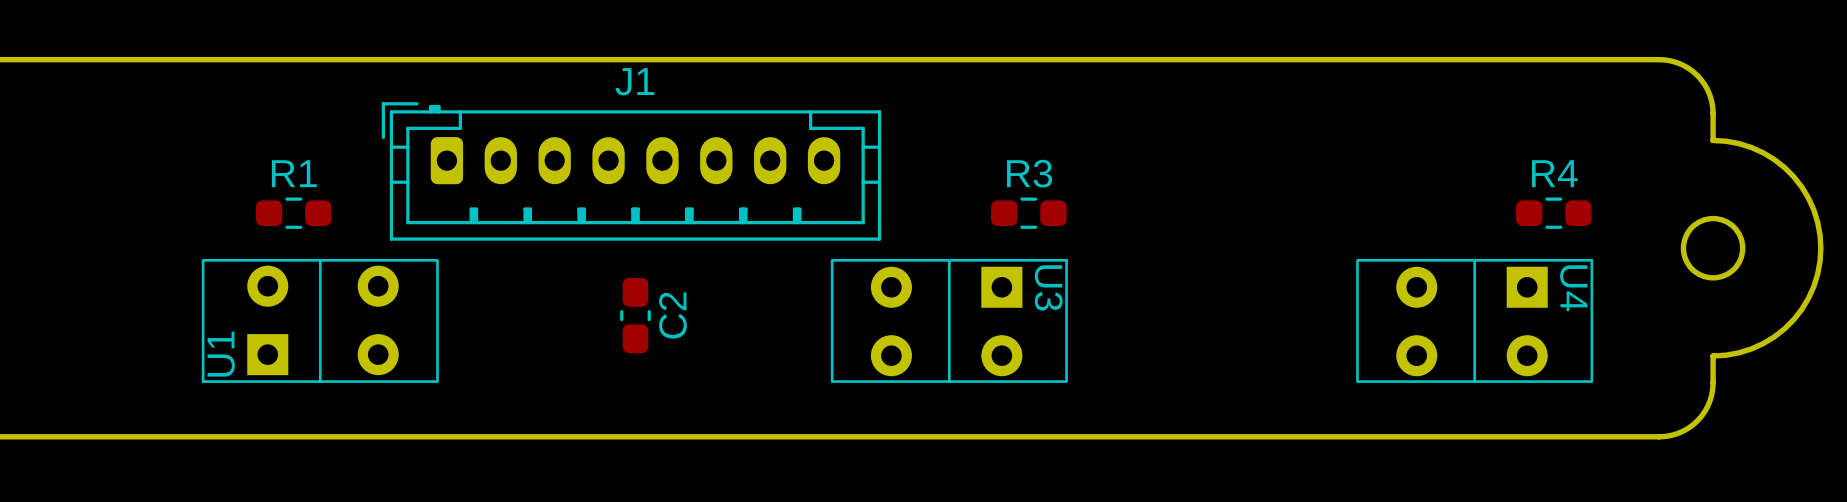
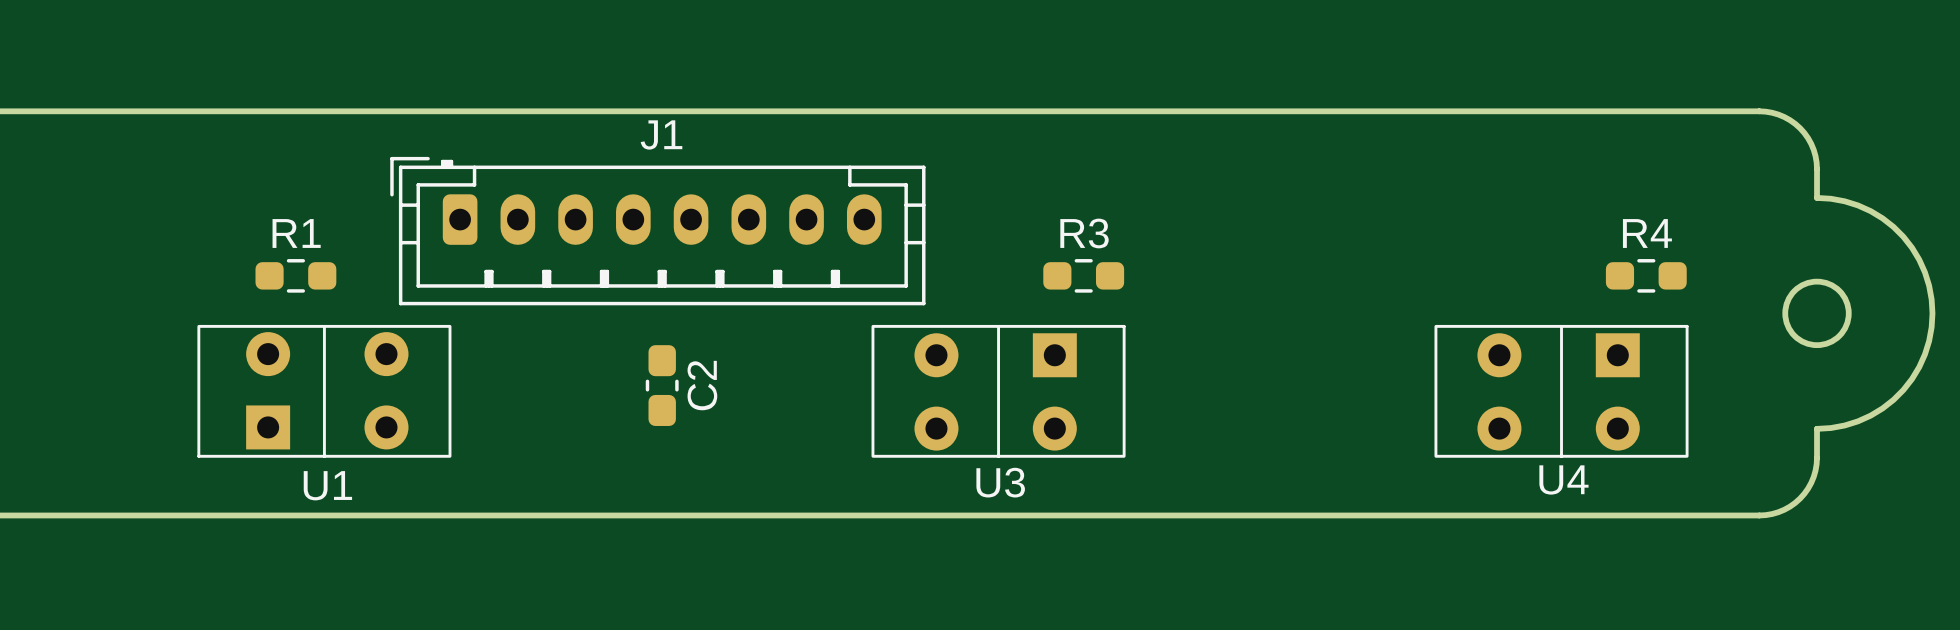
U3 name rotation: 0° (1048, 287) -> 90° counterclockwise (1000, 482)
U3 name position: U3 (1048, 287) -> U3 (1000, 482)
U4 name rotation: 0° (1573, 288) -> 90° counterclockwise (1563, 479)
U4 name position: U4 (1573, 288) -> U4 (1563, 479)
U1 name rotation: 0° (221, 354) -> 90° clockwise (327, 485)
U1 name position: U1 (221, 354) -> U1 (327, 485)

